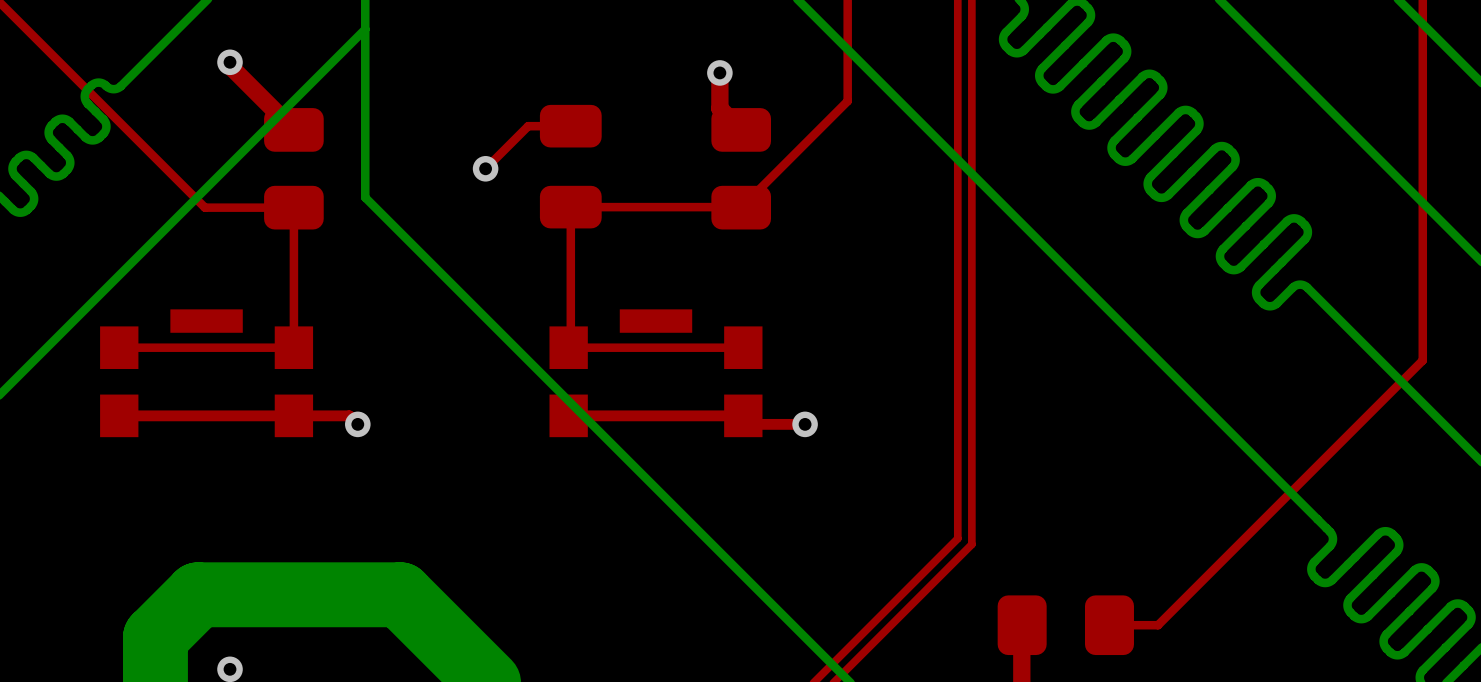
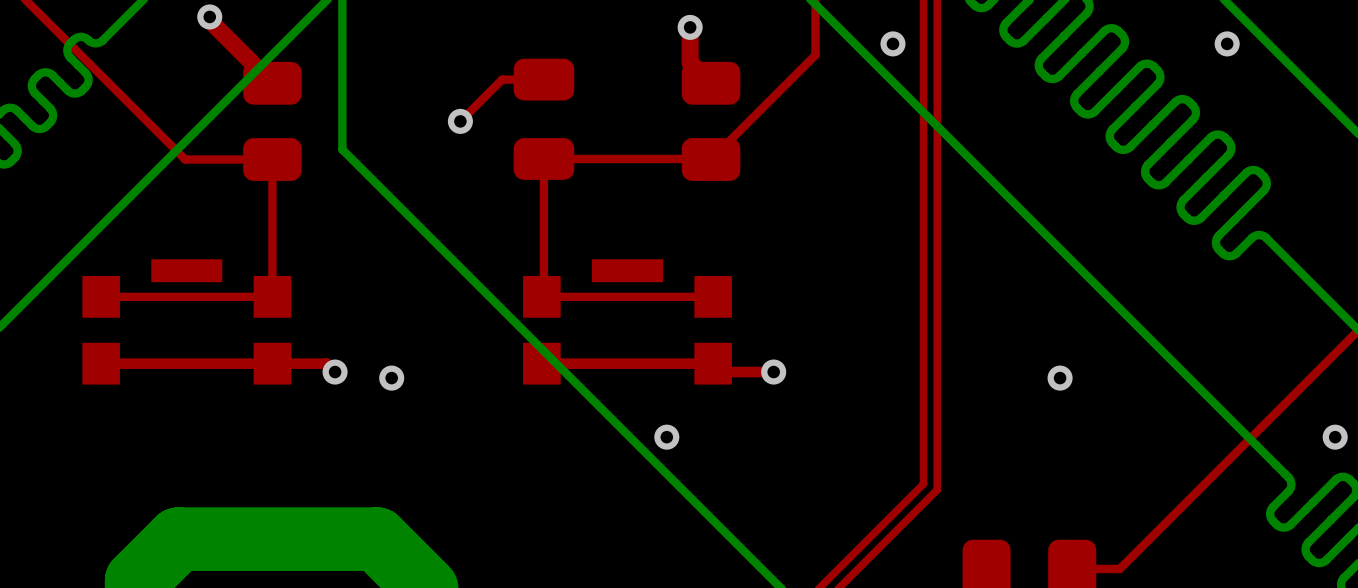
via: none -> (892, 43)
via: none -> (1227, 43)
via: none -> (391, 378)
via: none -> (1060, 378)
via: none -> (666, 437)
via: none -> (1335, 437)

